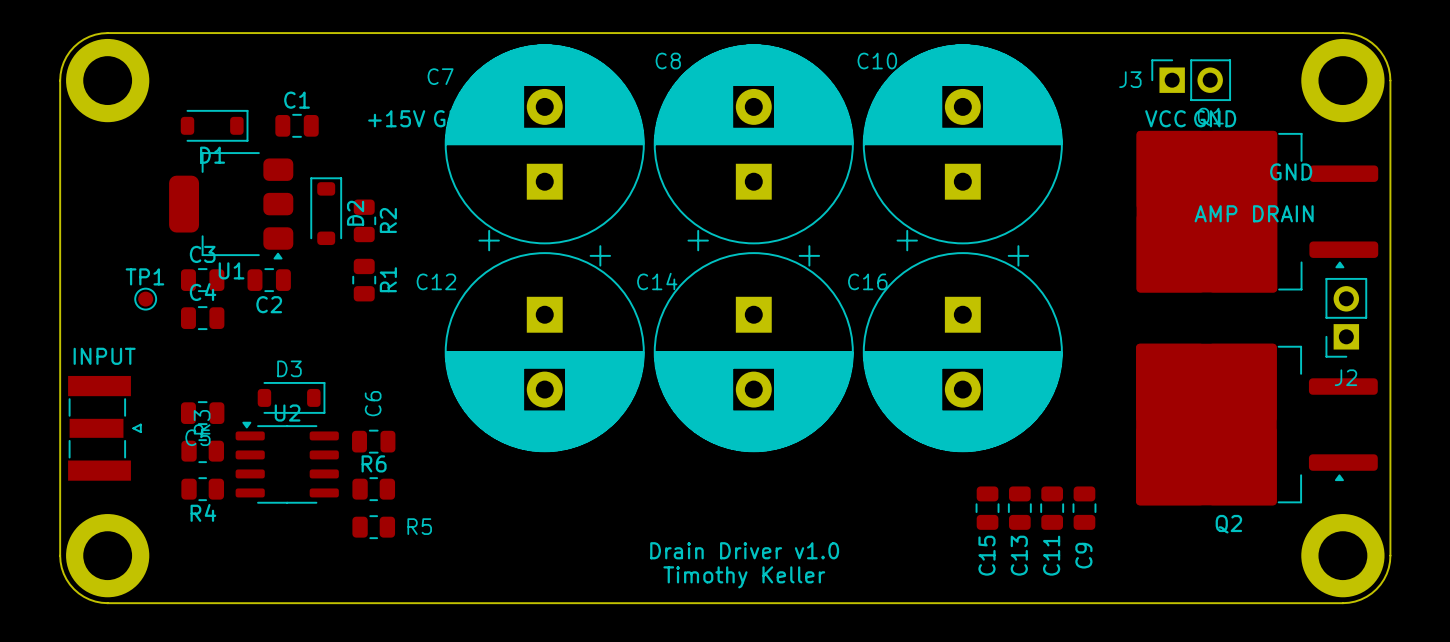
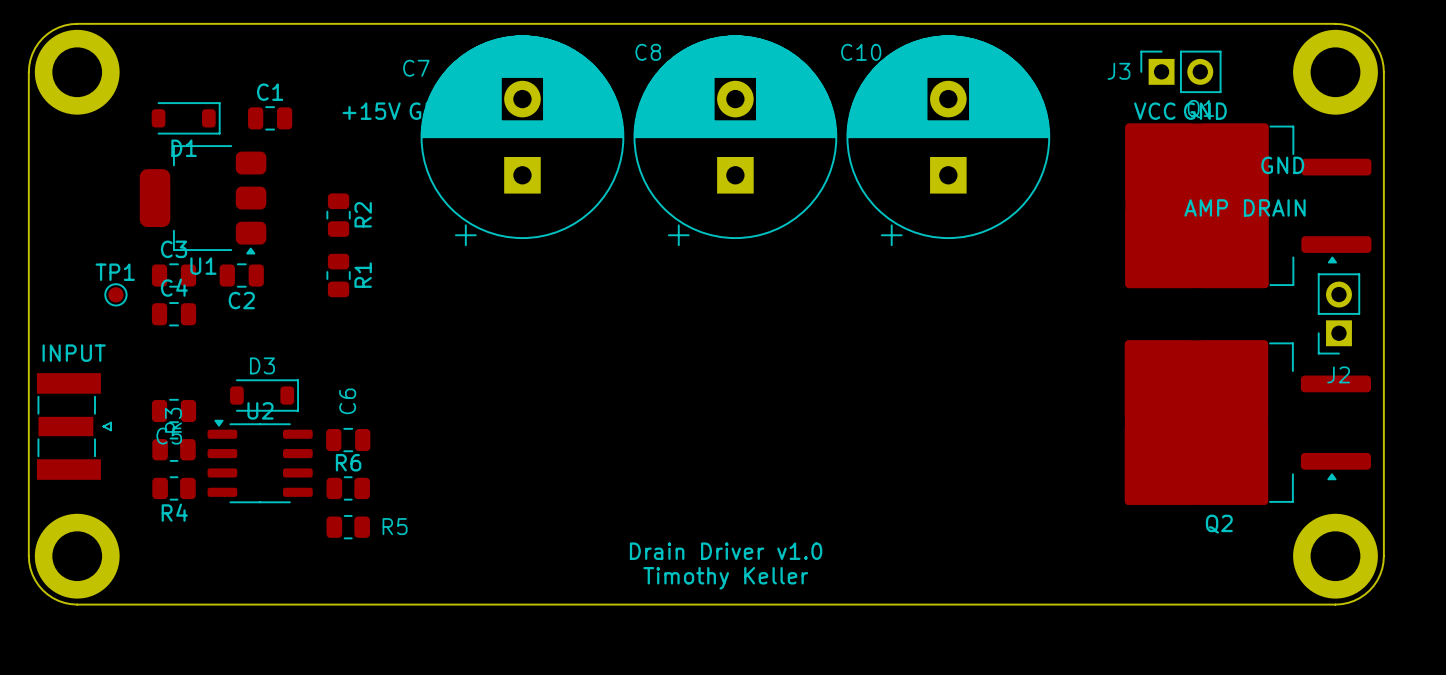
D2: (326, 211) -> none
C12: (544, 348) -> none
C14: (753, 348) -> none
C16: (962, 348) -> none
C15: (987, 508) -> none
C13: (1019, 508) -> none
C11: (1052, 508) -> none
C9: (1084, 508) -> none

